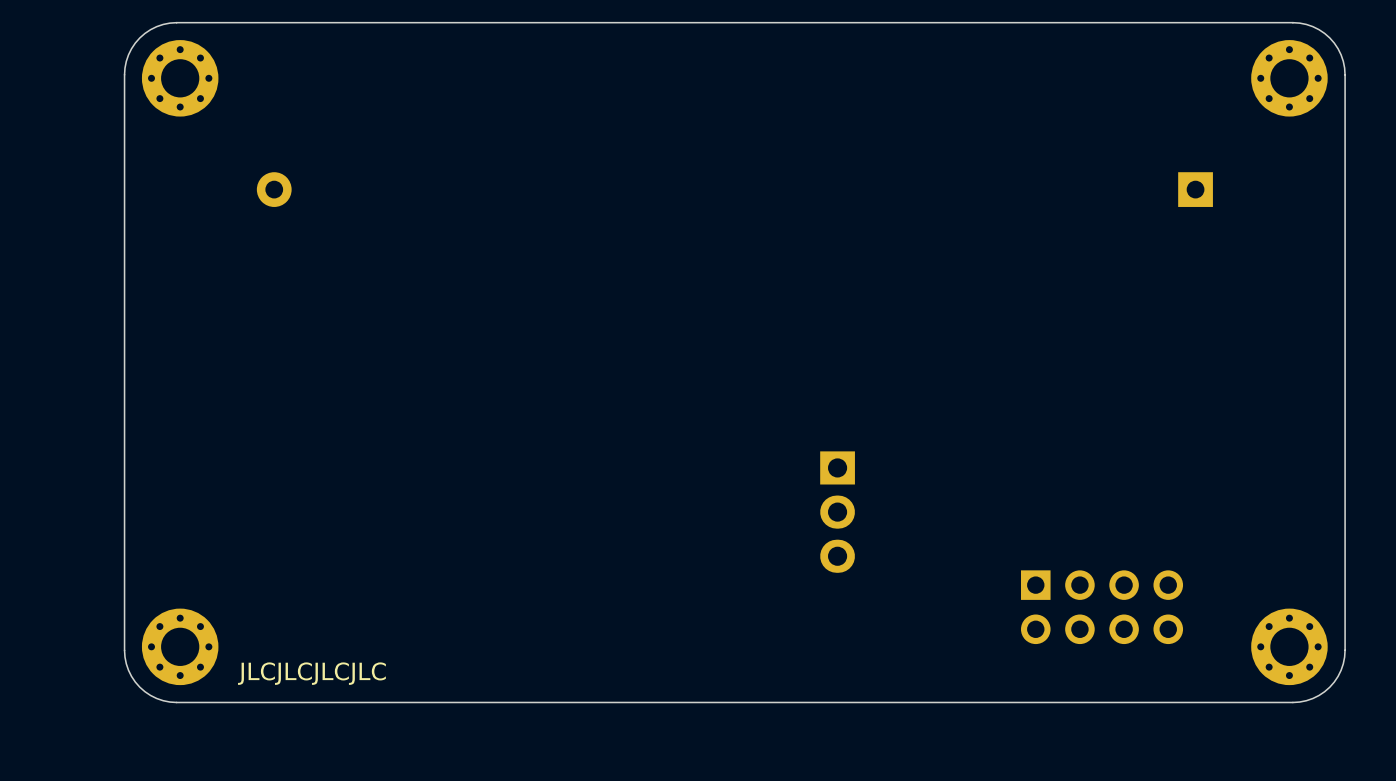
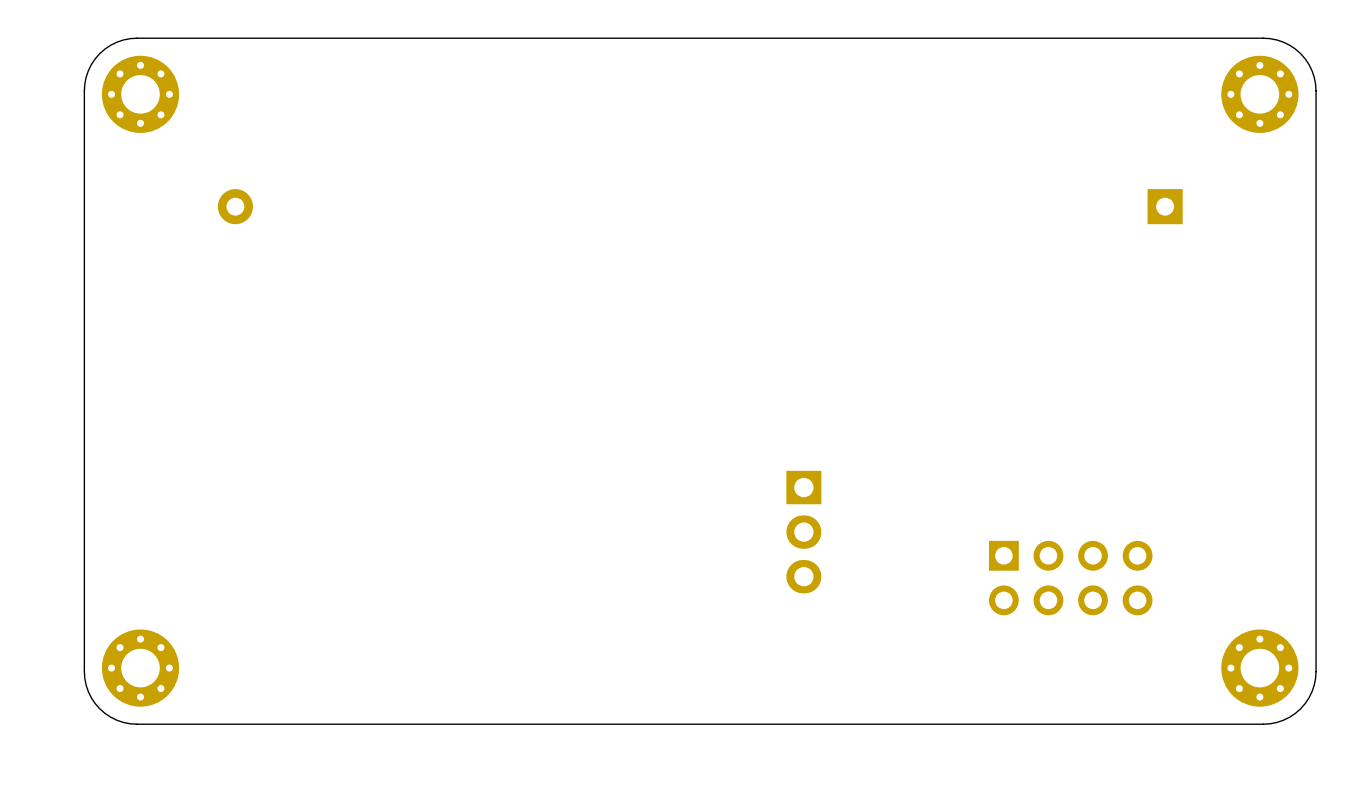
part position: (1102, 607) -> (1070, 578)
text: JLCJLCJLCJLC (311, 673) -> none

